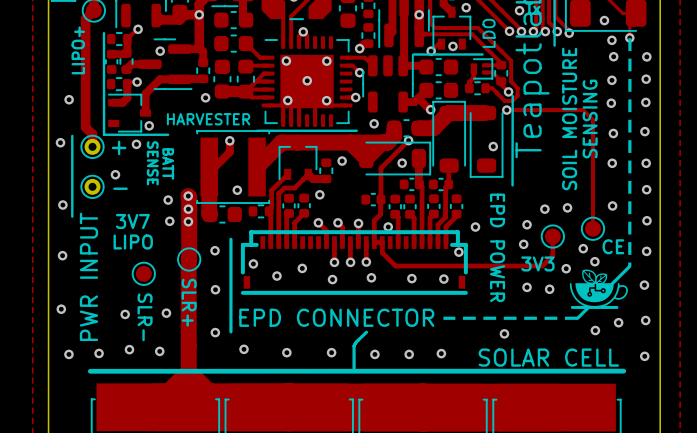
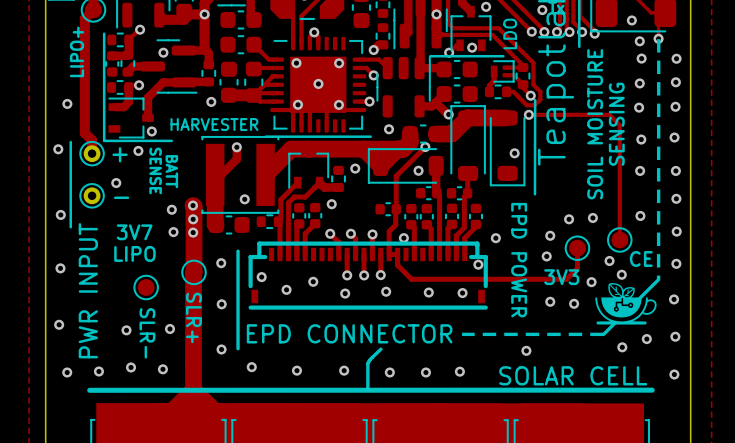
part rotation: 0° (395, 158) -> 180° (405, 165)

